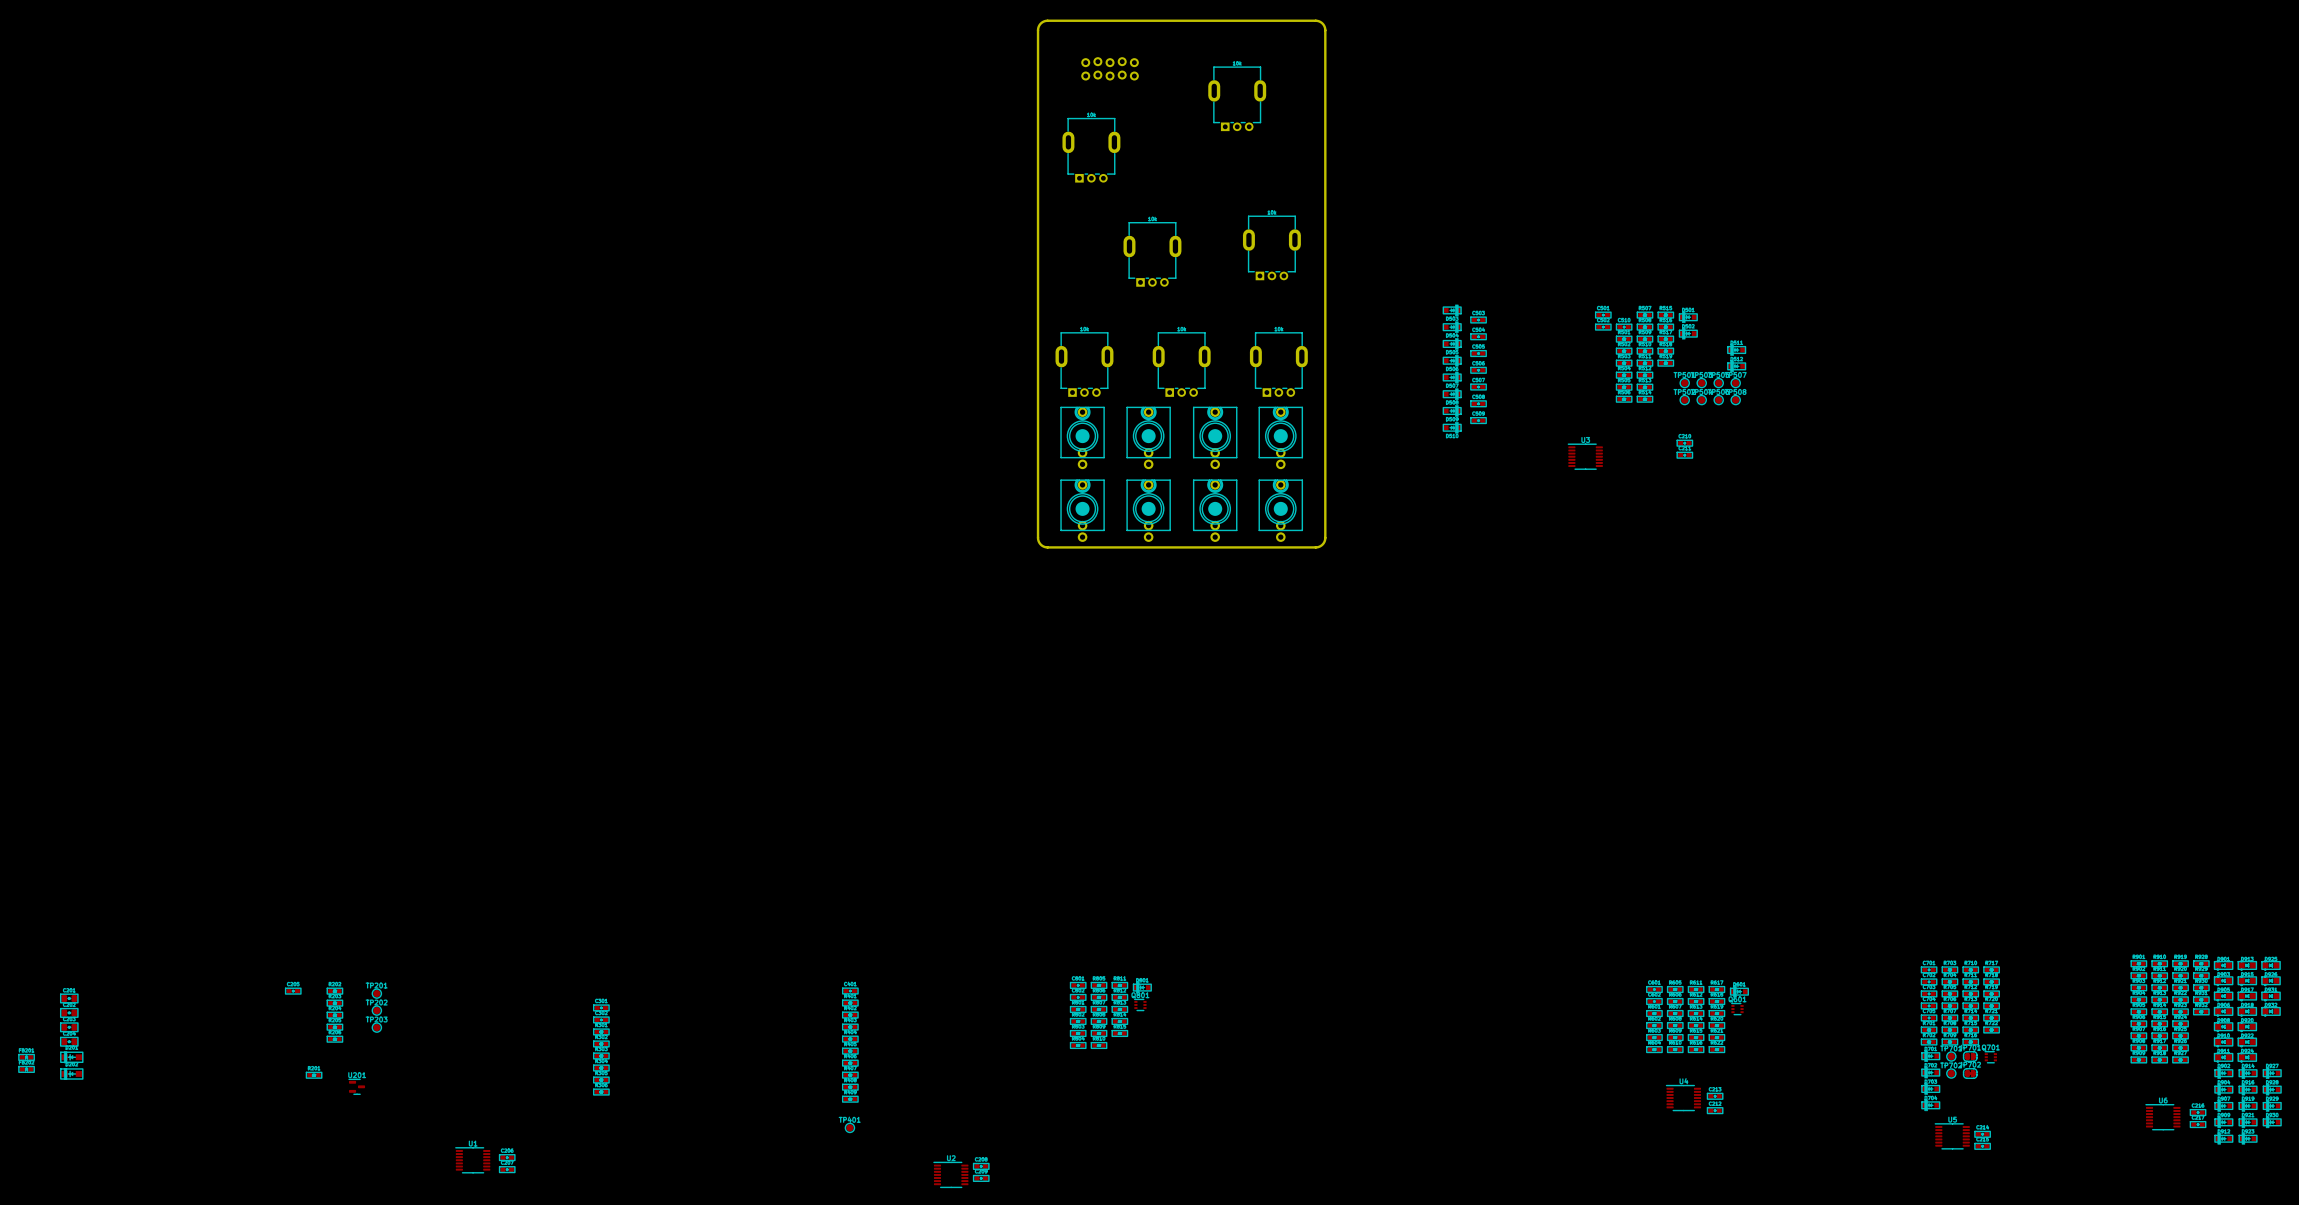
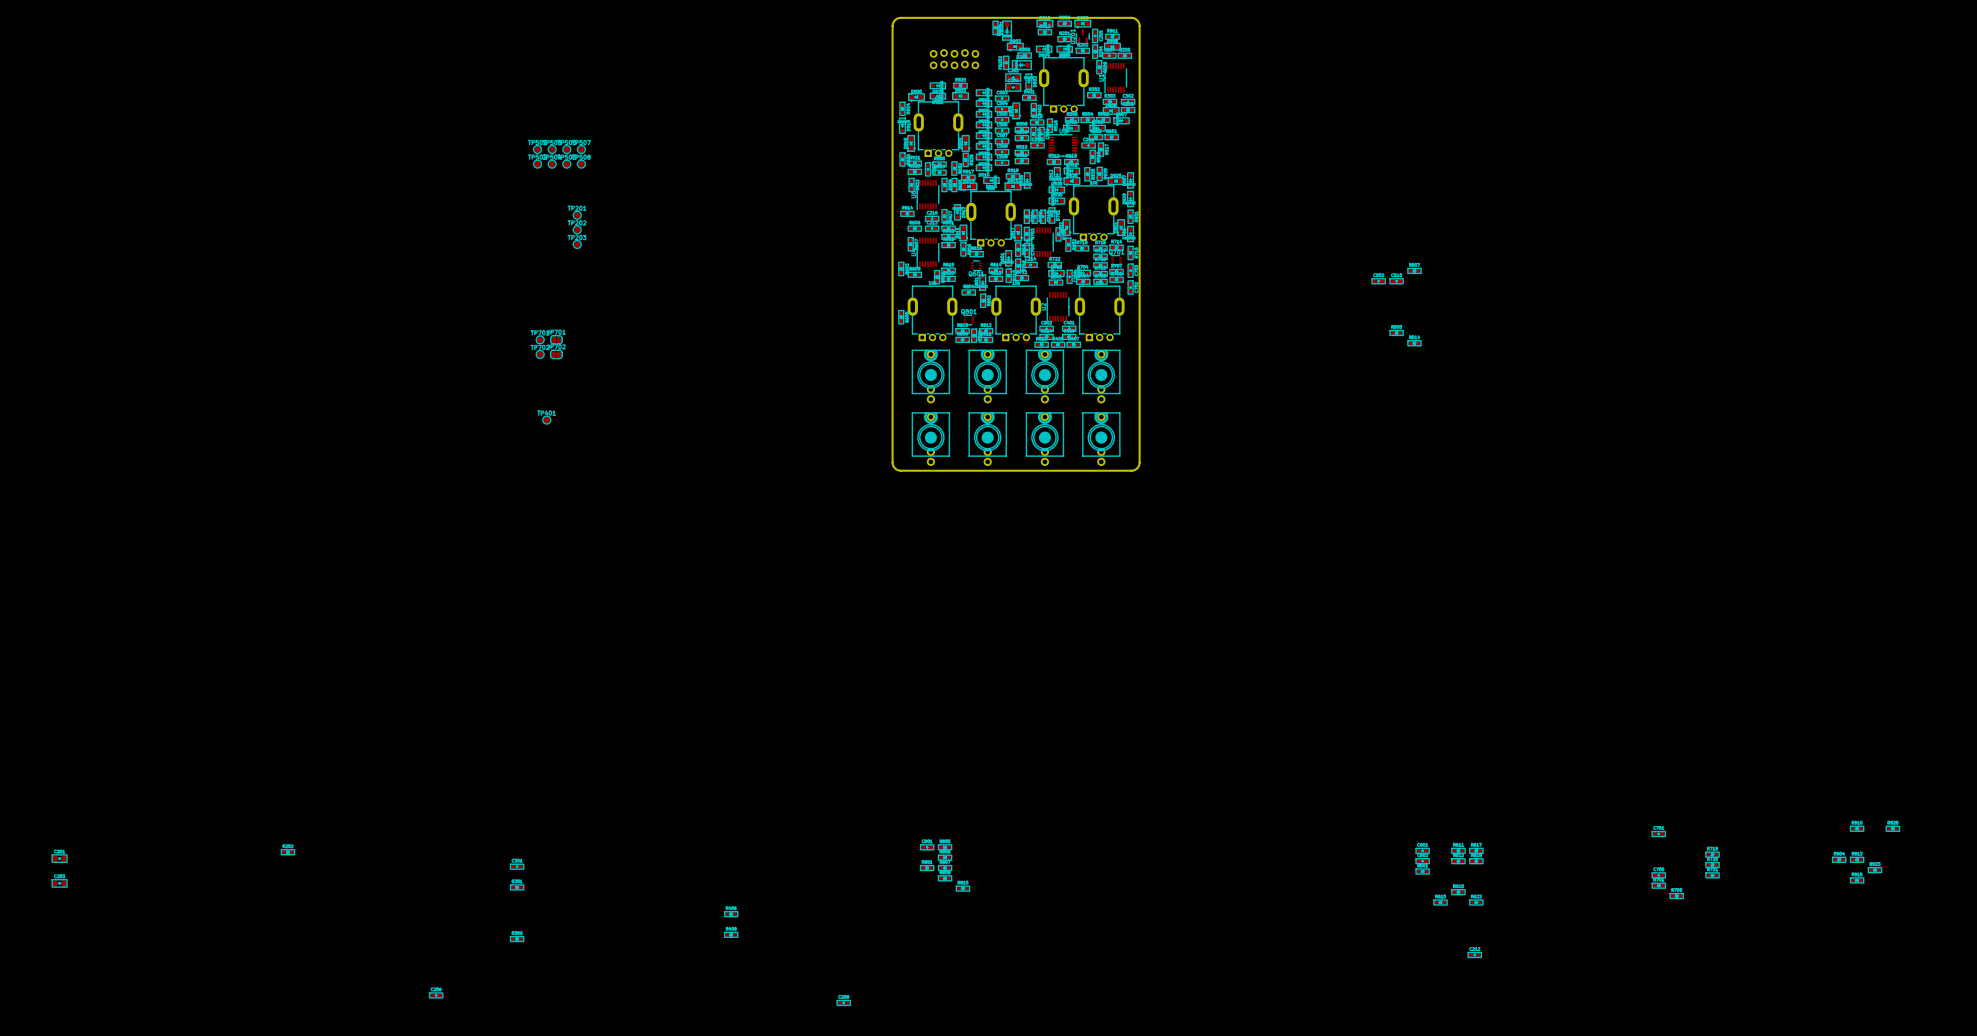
part position: (1452, 310) -> (984, 92)
part rotation: 0° (1603, 315) -> 90° clockwise (1041, 133)
part position: (1603, 315) -> (1041, 133)
part position: (1665, 315) -> (1037, 122)
part position: (1688, 317) -> (1097, 128)
part position: (1478, 320) -> (1002, 98)
part position: (1452, 327) -> (984, 103)
part position: (1644, 327) -> (1021, 129)
part rotation: 0° (1665, 327) -> 90° clockwise (1049, 125)
part position: (1665, 327) -> (1049, 125)
part position: (1688, 333) -> (1071, 128)
part position: (1478, 336) -> (1002, 109)
part position: (1624, 339) -> (1111, 137)
part position: (1644, 339) -> (1021, 138)
part rotation: 0° (1665, 339) -> 90° clockwise (1100, 149)
part position: (1665, 339) -> (1100, 149)
part position: (1452, 343) -> (984, 114)
part position: (1736, 349) -> (1071, 171)
part position: (1624, 351) -> (1103, 119)
part position: (1644, 351) -> (1021, 152)
part rotation: 0° (1665, 351) -> 90° clockwise (1092, 157)
part position: (1665, 351) -> (1092, 157)
part position: (1478, 353) -> (1002, 119)
part position: (1452, 360) -> (984, 124)
part position: (1624, 363) -> (1095, 137)
part position: (1644, 363) -> (1021, 161)
part position: (1665, 363) -> (1071, 161)
part rotation: 0° (1736, 366) -> 90° counterclockwise (1057, 175)
part position: (1736, 366) -> (1057, 175)
part position: (1478, 370) -> (1002, 130)
part position: (1624, 375) -> (1087, 119)
part position: (1644, 375) -> (1053, 161)
part position: (1452, 377) -> (984, 135)
part position: (1684, 383) -> (537, 149)
part position: (1701, 383) -> (552, 149)
part position: (1718, 383) -> (566, 149)
part position: (1735, 383) -> (581, 149)
part position: (1478, 387) -> (1002, 141)
part rotation: 0° (1644, 387) -> 90° clockwise (1033, 133)
part position: (1644, 387) -> (1033, 133)
part position: (1452, 394) -> (984, 146)
part position: (1624, 399) -> (1072, 119)
part position: (1684, 400) -> (537, 164)
part position: (1701, 400) -> (552, 164)
part position: (1718, 400) -> (566, 164)
part position: (1735, 400) -> (581, 164)
part position: (1478, 403) -> (1002, 152)
part position: (1452, 410) -> (984, 157)
part position: (1478, 420) -> (1002, 162)
part position: (1452, 427) -> (984, 167)
part position: (1684, 443) -> (1037, 145)
part position: (1684, 455) -> (1088, 145)
part position: (1585, 456) -> (1062, 145)
part position: (2138, 963) -> (948, 228)
part rotation: 0° (2180, 963) -> 90° clockwise (1018, 249)
part position: (2180, 963) -> (1018, 249)
part rotation: 0° (2223, 965) -> 90° counterclockwise (1016, 110)
part position: (2223, 965) -> (1016, 110)
part position: (2247, 965) -> (968, 186)
part position: (2271, 965) -> (1115, 181)
part rotation: 0° (1949, 969) -> 90° clockwise (1026, 233)
part position: (1949, 969) -> (1026, 233)
part rotation: 0° (1970, 969) -> 90° clockwise (1008, 275)
part position: (1970, 969) -> (1008, 275)
part position: (1991, 969) -> (1100, 256)
part position: (2138, 975) -> (948, 236)
part position: (2159, 975) -> (1112, 36)
part position: (2180, 975) -> (914, 171)
part rotation: 0° (2201, 975) -> 90° clockwise (1099, 173)
part position: (2201, 975) -> (1099, 173)
part position: (2223, 980) -> (1015, 46)
part position: (2247, 980) -> (1013, 186)
part position: (2271, 980) -> (1071, 181)
part rotation: 0° (1929, 981) -> 90° clockwise (1130, 287)
part position: (1929, 981) -> (1130, 287)
part rotation: 0° (1949, 981) -> 90° clockwise (1026, 216)
part position: (1949, 981) -> (1026, 216)
part position: (1970, 981) -> (1021, 278)
part position: (1991, 981) -> (1081, 248)
part position: (1119, 985) -> (986, 339)
part rotation: 0° (1142, 987) -> 90° counterclockwise (982, 282)
part position: (1142, 987) -> (982, 282)
part position: (2138, 987) -> (948, 245)
part position: (2159, 987) -> (1044, 32)
part position: (2180, 987) -> (914, 163)
part rotation: 0° (2201, 987) -> 90° clockwise (1087, 174)
part position: (2201, 987) -> (1087, 174)
part rotation: 0° (1675, 989) -> 90° clockwise (954, 185)
part position: (1675, 989) -> (954, 185)
part rotation: 0° (293, 991) -> 90° clockwise (1095, 35)
part position: (293, 991) -> (1095, 35)
part position: (850, 991) -> (1069, 328)
part rotation: 0° (1739, 991) -> 90° counterclockwise (1008, 258)
part position: (1739, 991) -> (1008, 258)
part position: (376, 993) -> (577, 215)
part rotation: 0° (1929, 993) -> 90° clockwise (1130, 270)
part position: (1929, 993) -> (1130, 270)
part rotation: 0° (1949, 993) -> 90° clockwise (1058, 234)
part position: (1949, 993) -> (1058, 234)
part rotation: 0° (1970, 993) -> 90° clockwise (1018, 265)
part position: (1970, 993) -> (1018, 265)
part position: (2223, 996) -> (1082, 23)
part rotation: 0° (2247, 996) -> 90° counterclockwise (1018, 232)
part position: (2247, 996) -> (1018, 232)
part rotation: 0° (2271, 996) -> 90° counterclockwise (1121, 227)
part position: (2271, 996) -> (1121, 227)
part position: (1078, 997) -> (1046, 328)
part position: (1119, 997) -> (986, 331)
part rotation: 0° (2180, 999) -> 90° clockwise (911, 185)
part position: (2180, 999) -> (911, 185)
part rotation: 0° (2201, 999) -> 90° clockwise (1130, 216)
part position: (2201, 999) -> (1130, 216)
part position: (1675, 1001) -> (914, 228)
part position: (334, 1003) -> (1082, 50)
part position: (850, 1003) -> (1029, 97)
part position: (1140, 1004) -> (968, 320)
part rotation: 0° (1929, 1005) -> 90° clockwise (1026, 250)
part position: (1929, 1005) -> (1026, 250)
part position: (1949, 1005) -> (1116, 279)
part position: (1970, 1005) -> (1100, 273)
part position: (1119, 1009) -> (1041, 344)
part rotation: 0° (1737, 1009) -> 180° (976, 265)
part position: (1737, 1009) -> (976, 265)
part position: (376, 1010) -> (577, 229)
part position: (2138, 1011) -> (1024, 55)
part position: (2159, 1011) -> (907, 213)
part rotation: 0° (2201, 1011) -> 90° clockwise (1068, 244)
part position: (2201, 1011) -> (1068, 244)
part position: (2223, 1011) -> (1111, 110)
part rotation: 0° (2247, 1011) -> 90° counterclockwise (911, 143)
part position: (2247, 1011) -> (911, 143)
part rotation: 0° (2271, 1011) -> 90° counterclockwise (1066, 227)
part position: (2271, 1011) -> (1066, 227)
part position: (69, 1012) -> (1013, 77)
part rotation: 0° (1675, 1013) -> 90° clockwise (910, 244)
part position: (1675, 1013) -> (910, 244)
part position: (1696, 1013) -> (995, 278)
part position: (1716, 1013) -> (948, 270)
part rotation: 0° (334, 1015) -> 90° clockwise (1095, 51)
part position: (334, 1015) -> (1095, 51)
part rotation: 0° (850, 1015) -> 90° clockwise (1033, 110)
part position: (850, 1015) -> (1033, 110)
part position: (1949, 1017) -> (1116, 271)
part position: (1970, 1017) -> (1116, 247)
part position: (601, 1019) -> (1128, 101)
part rotation: 0° (1078, 1021) -> 90° clockwise (983, 300)
part position: (1078, 1021) -> (983, 300)
part position: (1119, 1021) -> (1046, 336)
part position: (2138, 1023) -> (1064, 23)
part rotation: 0° (2180, 1023) -> 90° clockwise (902, 108)
part position: (2180, 1023) -> (902, 108)
part rotation: 0° (1654, 1025) -> 90° clockwise (954, 168)
part position: (1654, 1025) -> (954, 168)
part rotation: 0° (1675, 1025) -> 90° clockwise (901, 317)
part position: (1675, 1025) -> (901, 317)
part position: (1696, 1025) -> (995, 270)
part position: (1716, 1025) -> (948, 278)
part position: (2223, 1026) -> (1112, 46)
part position: (2247, 1026) -> (916, 97)
part position: (334, 1027) -> (1124, 55)
part position: (376, 1027) -> (577, 244)
part position: (850, 1027) -> (1100, 281)
part position: (1949, 1029) -> (1100, 265)
part rotation: 0° (1970, 1029) -> 90° clockwise (1130, 252)
part position: (1970, 1029) -> (1130, 252)
part position: (1991, 1029) -> (1054, 264)
part position: (1078, 1033) -> (1056, 282)
part position: (1099, 1033) -> (962, 339)
part position: (2138, 1035) -> (939, 172)
part rotation: 0° (2159, 1035) -> 90° clockwise (963, 249)
part position: (2159, 1035) -> (963, 249)
part position: (2180, 1035) -> (960, 85)
part rotation: 0° (1654, 1037) -> 90° clockwise (901, 268)
part position: (1654, 1037) -> (901, 268)
part position: (1675, 1037) -> (914, 274)
part rotation: 0° (1716, 1037) -> 90° clockwise (937, 277)
part position: (1716, 1037) -> (937, 277)
part rotation: 0° (334, 1039) -> 90° clockwise (1099, 67)
part position: (334, 1039) -> (1099, 67)
part position: (850, 1039) -> (1083, 281)
part position: (69, 1041) -> (1013, 87)
part rotation: 0° (1929, 1042) -> 90° clockwise (1034, 216)
part position: (1929, 1042) -> (1034, 216)
part position: (1970, 1042) -> (1100, 248)
part position: (2223, 1042) -> (1044, 23)
part position: (2247, 1042) -> (960, 96)
part position: (601, 1043) -> (1094, 95)
part position: (1078, 1045) -> (968, 292)
part position: (1099, 1045) -> (962, 331)
part position: (2138, 1047) -> (939, 164)
part position: (2159, 1047) -> (968, 177)
part rotation: 0° (2180, 1047) -> 90° clockwise (965, 159)
part position: (2180, 1047) -> (965, 159)
part rotation: 0° (1654, 1049) -> 90° clockwise (902, 159)
part position: (1654, 1049) -> (902, 159)
part position: (1696, 1049) -> (976, 254)
part position: (850, 1051) -> (1058, 344)
part position: (601, 1055) -> (1109, 101)
part rotation: 0° (1930, 1056) -> 90° clockwise (1051, 215)
part position: (1930, 1056) -> (1051, 215)
part position: (1951, 1056) -> (540, 339)
part position: (1970, 1056) -> (556, 339)
part rotation: 0° (26, 1057) -> 90° clockwise (995, 27)
part position: (26, 1057) -> (995, 27)
part rotation: 0° (71, 1057) -> 90° counterclockwise (1007, 30)
part position: (71, 1057) -> (1007, 30)
part position: (1990, 1057) -> (1116, 260)
part rotation: 0° (2223, 1057) -> 90° counterclockwise (963, 232)
part position: (2223, 1057) -> (963, 232)
part rotation: 0° (2247, 1057) -> 90° counterclockwise (965, 143)
part position: (2247, 1057) -> (965, 143)
part rotation: 0° (2138, 1059) -> 90° clockwise (944, 185)
part position: (2138, 1059) -> (944, 185)
part position: (2159, 1059) -> (1013, 176)
part rotation: 0° (2180, 1059) -> 90° clockwise (944, 216)
part position: (2180, 1059) -> (944, 216)
part rotation: 0° (601, 1068) -> 90° clockwise (974, 335)
part position: (601, 1068) -> (974, 335)
part rotation: 0° (26, 1069) -> 90° counterclockwise (1006, 62)
part position: (26, 1069) -> (1006, 62)
part rotation: 0° (1930, 1072) -> 90° counterclockwise (1130, 233)
part position: (1930, 1072) -> (1130, 233)
part position: (1951, 1073) -> (540, 354)
part position: (1970, 1073) -> (556, 354)
part rotation: 0° (2223, 1073) -> 90° clockwise (1028, 81)
part position: (2223, 1073) -> (1028, 81)
part rotation: 0° (2248, 1073) -> 180° (991, 180)
part position: (2248, 1073) -> (991, 180)
part rotation: 0° (2272, 1073) -> 90° counterclockwise (1130, 180)
part position: (2272, 1073) -> (1130, 180)
part position: (71, 1074) -> (1021, 65)
part position: (314, 1075) -> (1064, 39)
part position: (850, 1075) -> (1073, 344)
part position: (601, 1080) -> (1128, 110)
part rotation: 0° (356, 1086) -> 90° counterclockwise (1082, 36)
part position: (356, 1086) -> (1082, 36)
part position: (1930, 1088) -> (1056, 273)
part rotation: 0° (2223, 1089) -> 180° (1044, 49)
part position: (2223, 1089) -> (1044, 49)
part rotation: 0° (2248, 1089) -> 90° counterclockwise (1027, 180)
part position: (2248, 1089) -> (1027, 180)
part position: (2272, 1089) -> (1056, 189)
part position: (1715, 1096) -> (932, 228)
part rotation: 0° (1683, 1098) -> 90° counterclockwise (928, 252)
part position: (1683, 1098) -> (928, 252)
part position: (850, 1099) -> (1069, 336)
part position: (1930, 1105) -> (1082, 273)
part position: (2223, 1105) -> (1121, 120)
part rotation: 0° (2248, 1105) -> 90° clockwise (902, 125)
part position: (2248, 1105) -> (902, 125)
part rotation: 0° (2272, 1105) -> 90° counterclockwise (1130, 198)
part position: (2272, 1105) -> (1130, 198)
part position: (2198, 1112) -> (932, 218)
part rotation: 0° (2163, 1117) -> 90° counterclockwise (928, 194)
part position: (2163, 1117) -> (928, 194)
part rotation: 0° (2223, 1122) -> 180° (1064, 49)
part position: (2223, 1122) -> (1064, 49)
part rotation: 0° (2248, 1122) -> 180° (937, 96)
part position: (2248, 1122) -> (937, 96)
part position: (2272, 1122) -> (1056, 201)
part rotation: 0° (2198, 1124) -> 90° clockwise (928, 169)
part position: (2198, 1124) -> (928, 169)
part position: (849, 1127) -> (546, 420)
part position: (1982, 1134) -> (1030, 264)
part rotation: 0° (1952, 1136) -> 90° counterclockwise (1042, 242)
part position: (1952, 1136) -> (1042, 242)
part rotation: 0° (2223, 1138) -> 90° clockwise (957, 212)
part position: (2223, 1138) -> (957, 212)
part rotation: 0° (2248, 1138) -> 180° (937, 85)
part position: (2248, 1138) -> (937, 85)
part rotation: 0° (1982, 1146) -> 90° clockwise (1042, 216)
part position: (1982, 1146) -> (1042, 216)
part rotation: 0° (472, 1160) -> 90° counterclockwise (1115, 78)
part position: (472, 1160) -> (1115, 78)
part position: (507, 1169) -> (1109, 55)
part rotation: 0° (951, 1174) -> 90° counterclockwise (1058, 306)
part position: (951, 1174) -> (1058, 306)
part rotation: 0° (981, 1178) -> 90° clockwise (1069, 276)
part position: (981, 1178) -> (1069, 276)

